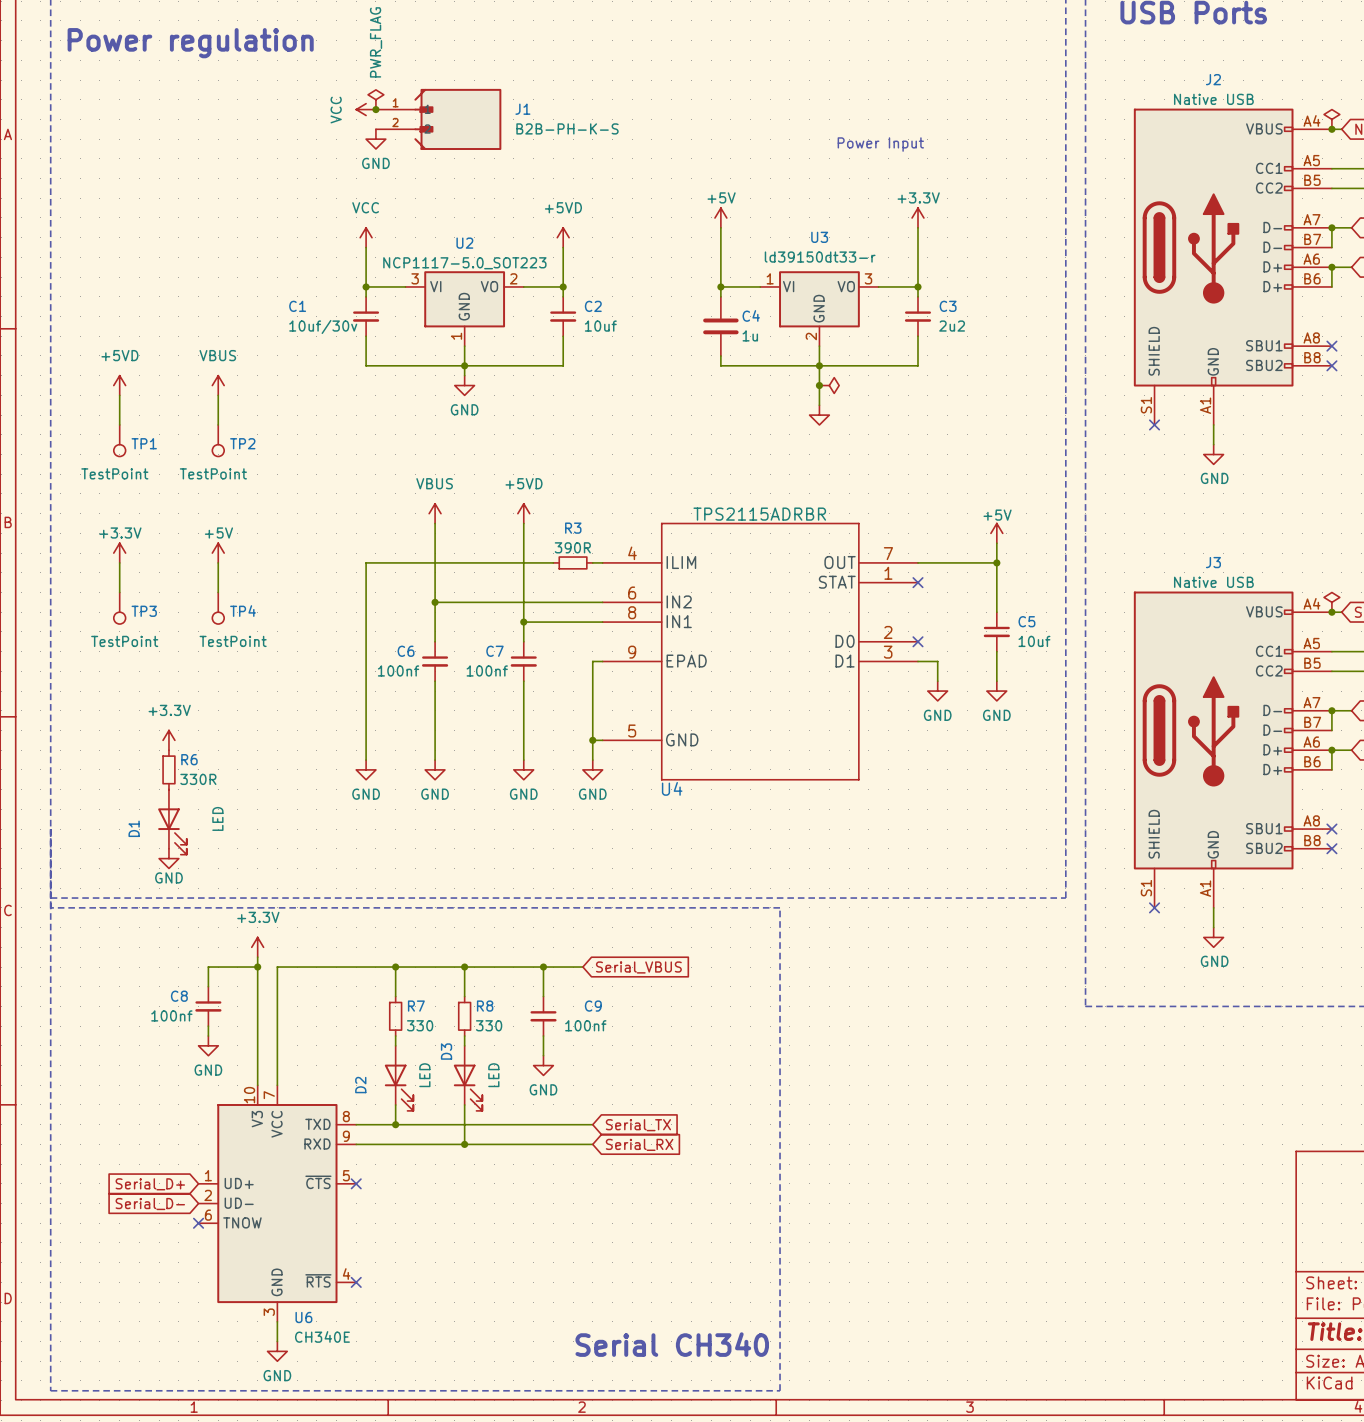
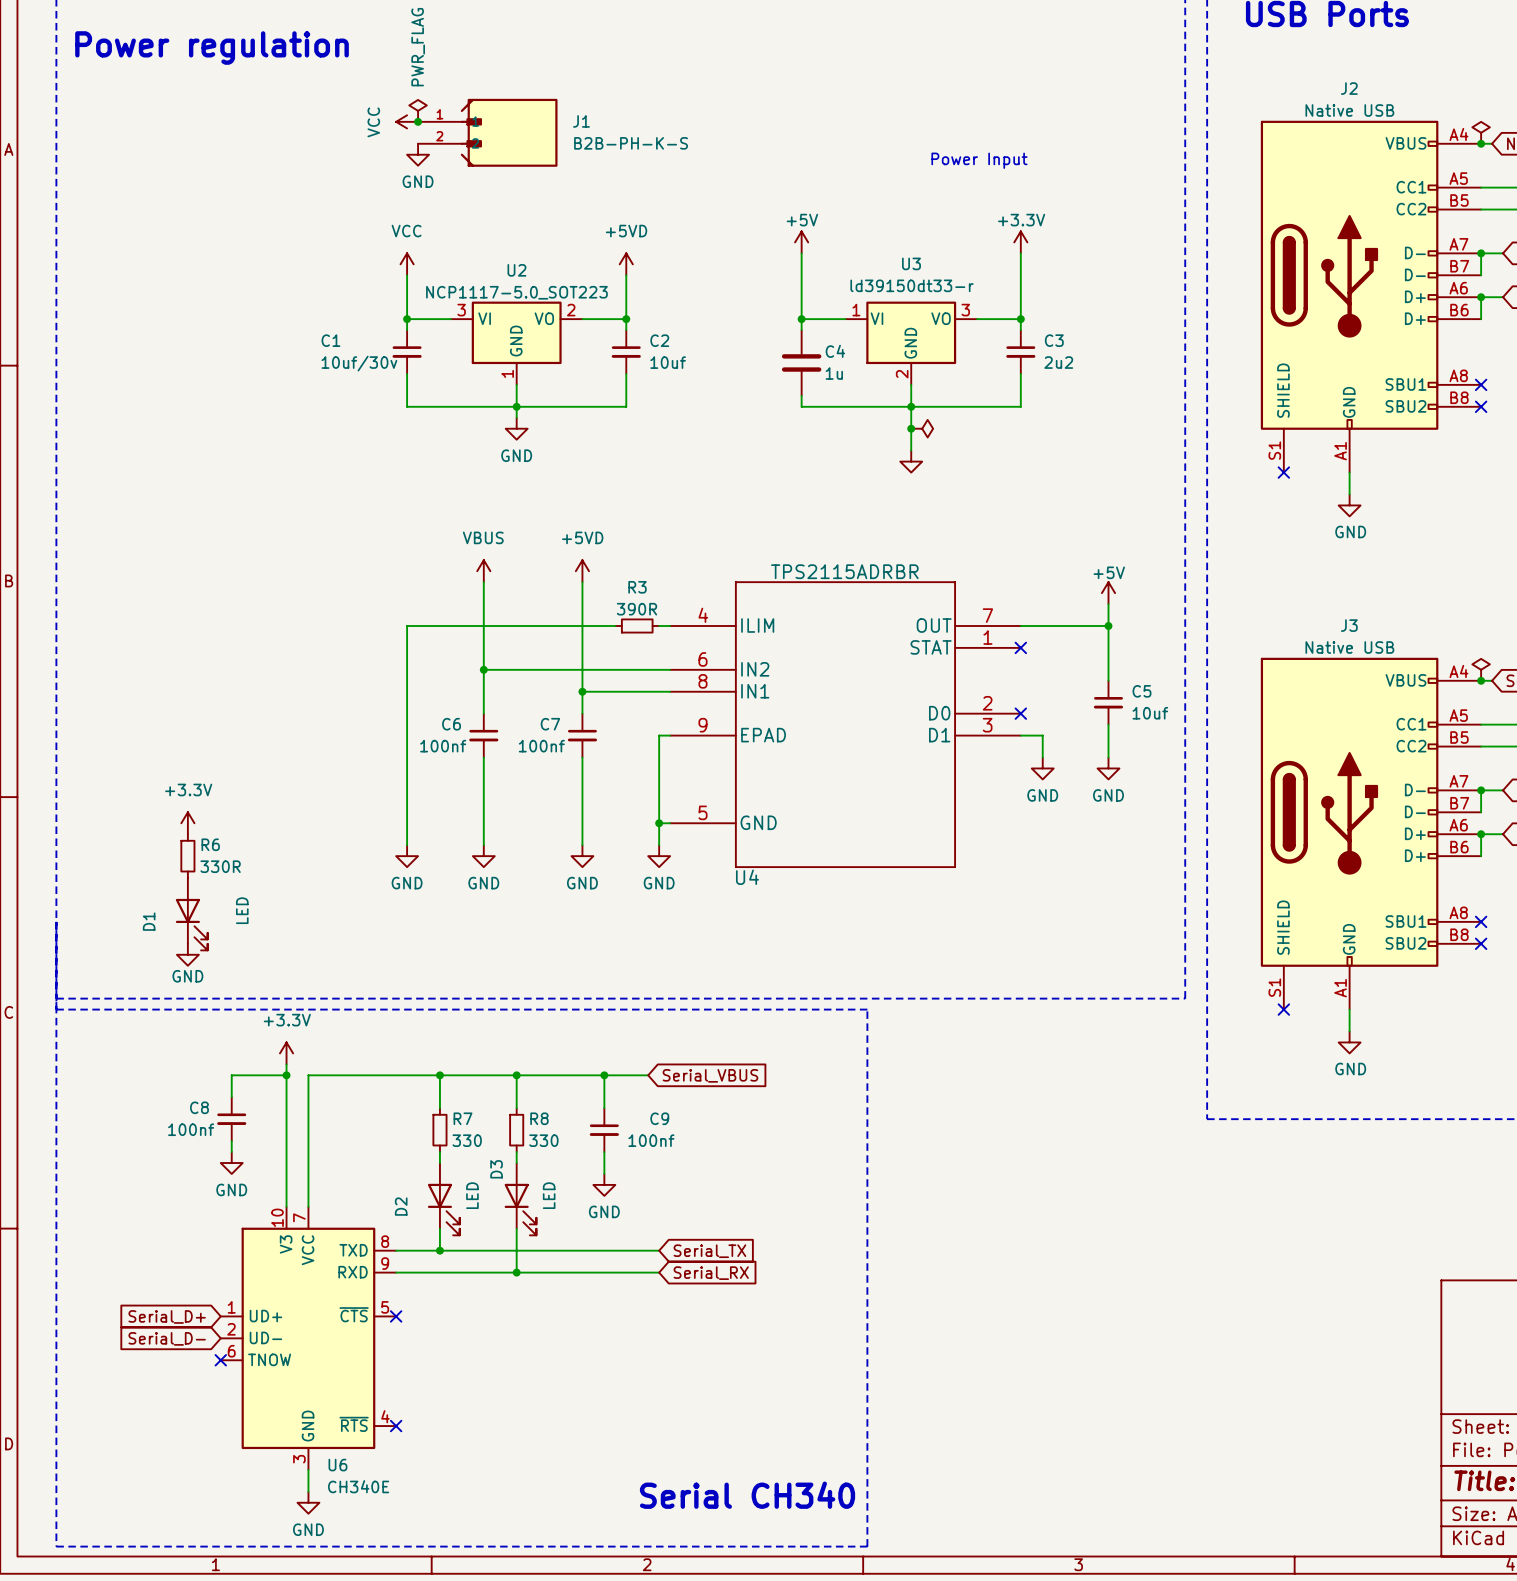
power symbol: +5VD (119, 385) -> none
power symbol: VBUS (218, 385) -> none
wire: (119, 395) (119, 424) -> none
wire: (218, 395) (218, 424) -> none
TP1: TestPoint (119, 440) -> none
TP2: TestPoint (218, 440) -> none
power symbol: +3.3V (119, 553) -> none
power symbol: +5V (218, 553) -> none
wire: (119, 562) (119, 592) -> none
wire: (218, 562) (218, 592) -> none
TP3: TestPoint (119, 608) -> none
TP4: TestPoint (218, 608) -> none

